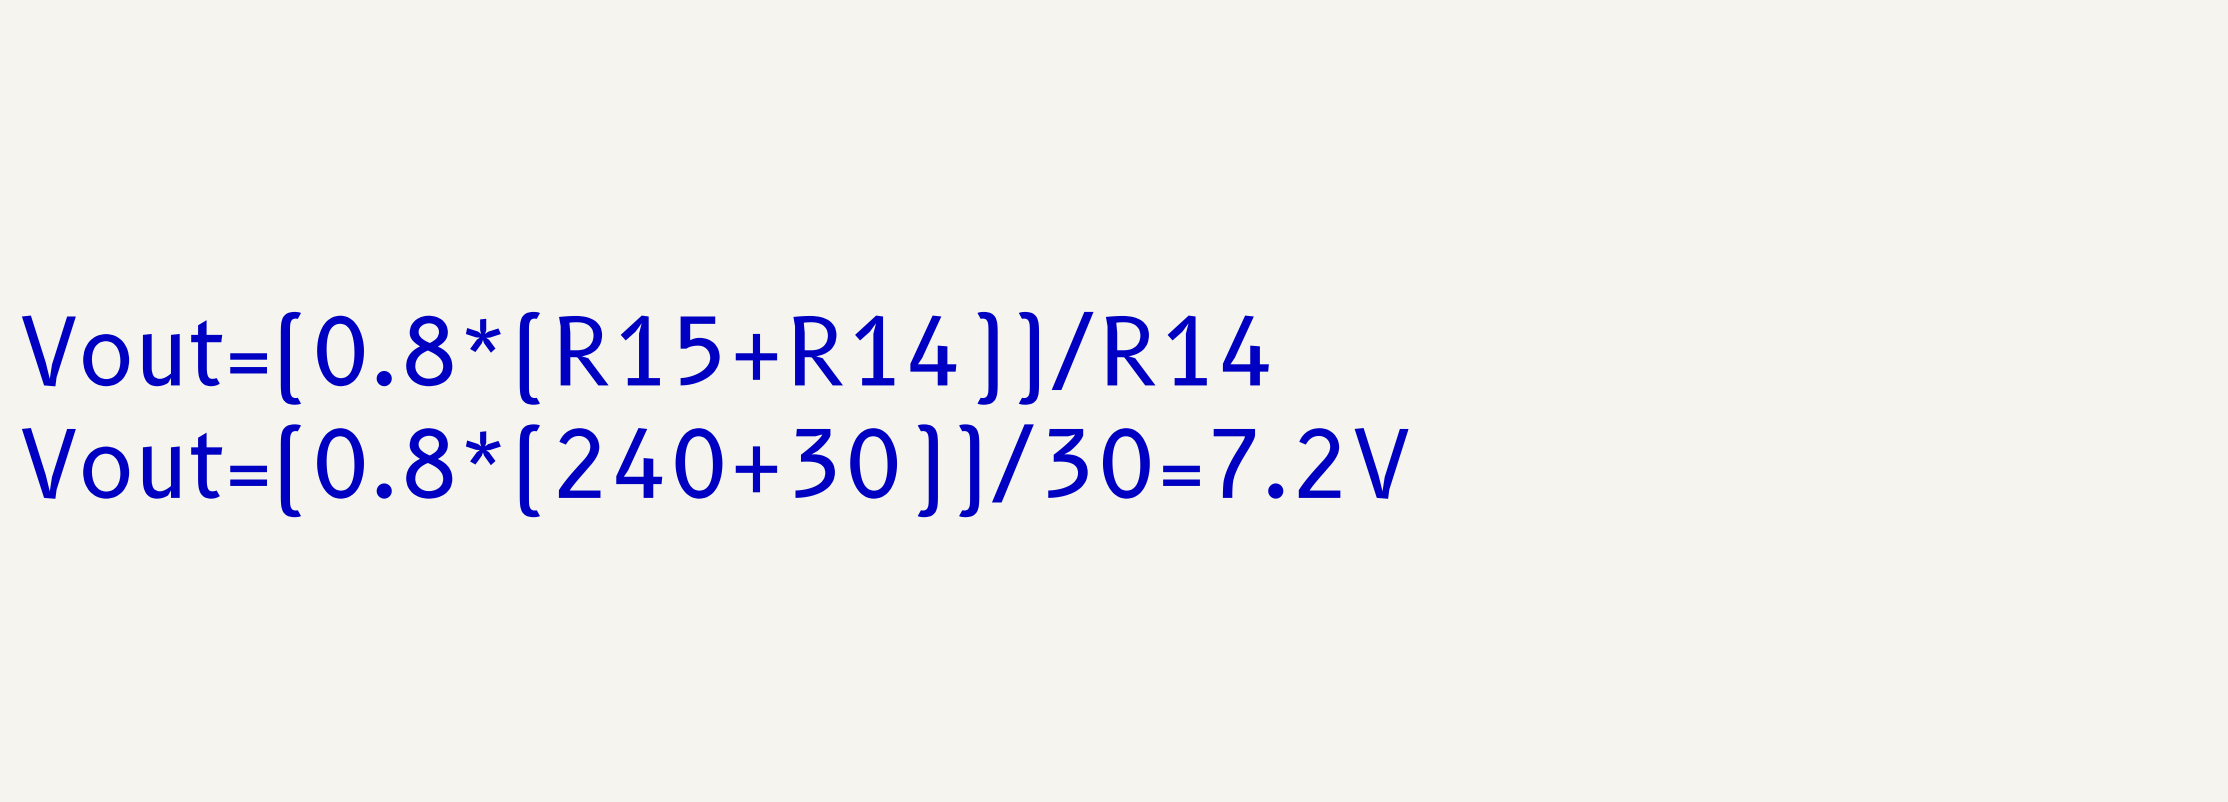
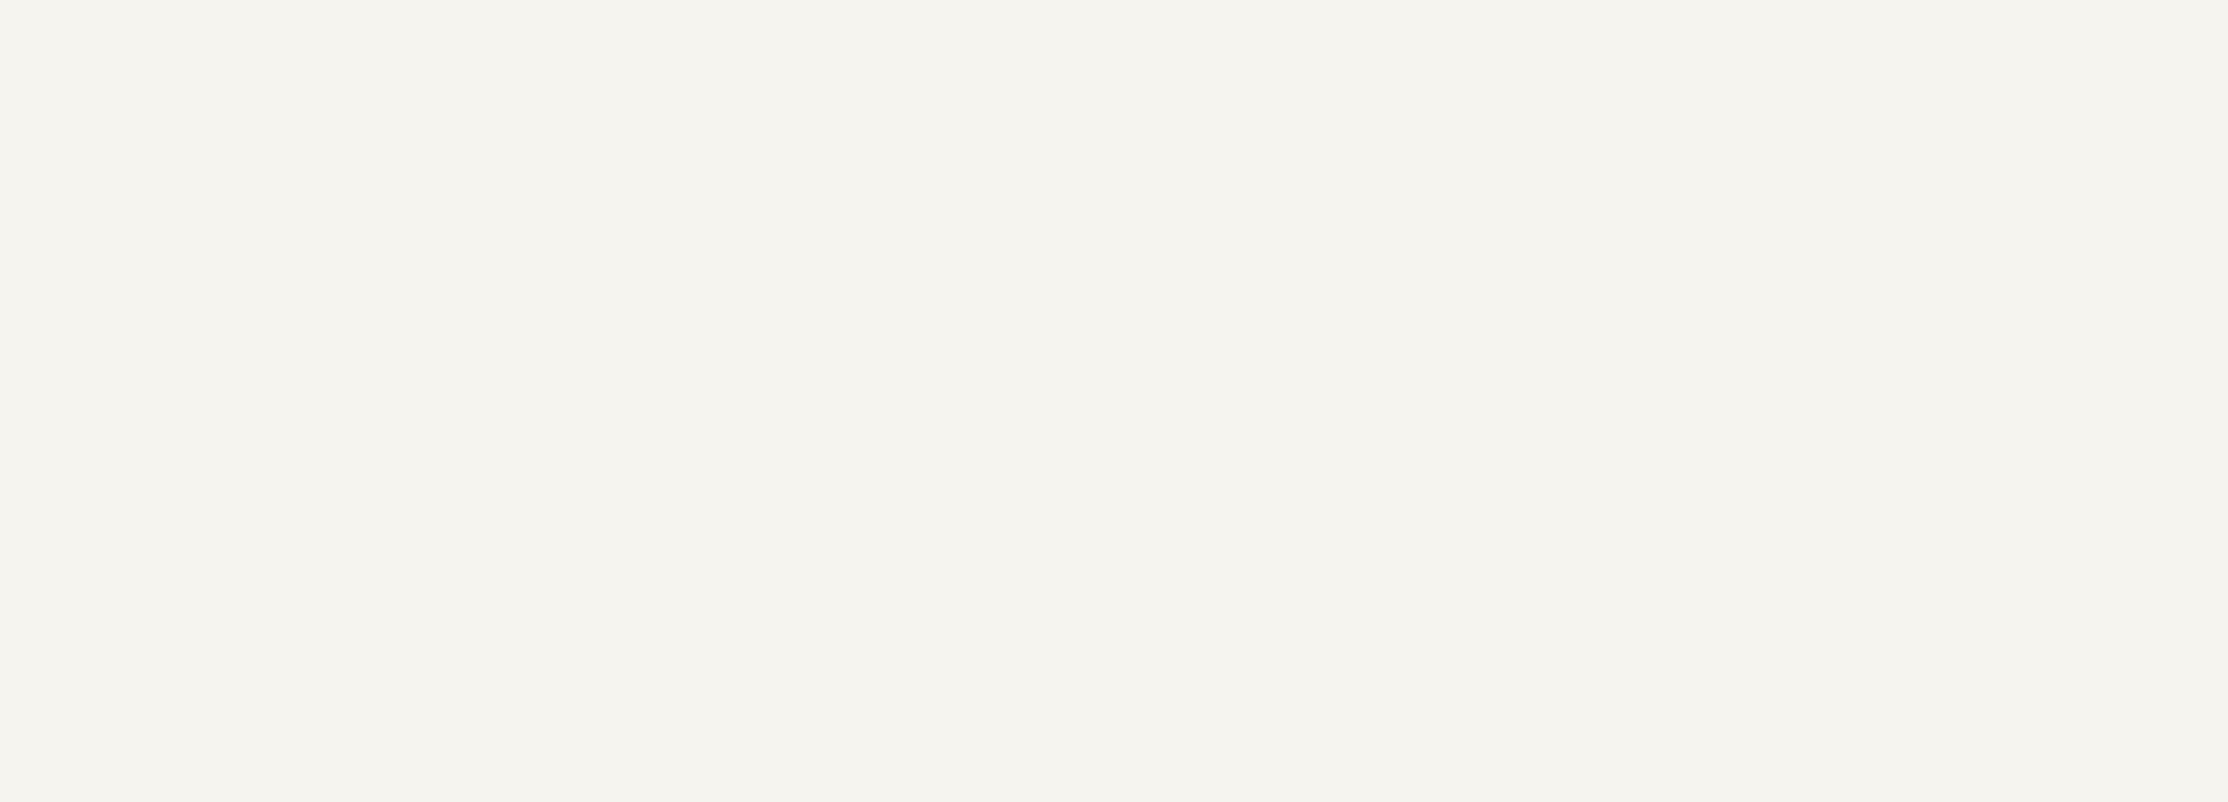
text: Vout=(0.8*(R15+R14))/R14 (645, 358) -> none
text: Vout=(0.8*(240+30))/30=7.2V (715, 470) -> none

